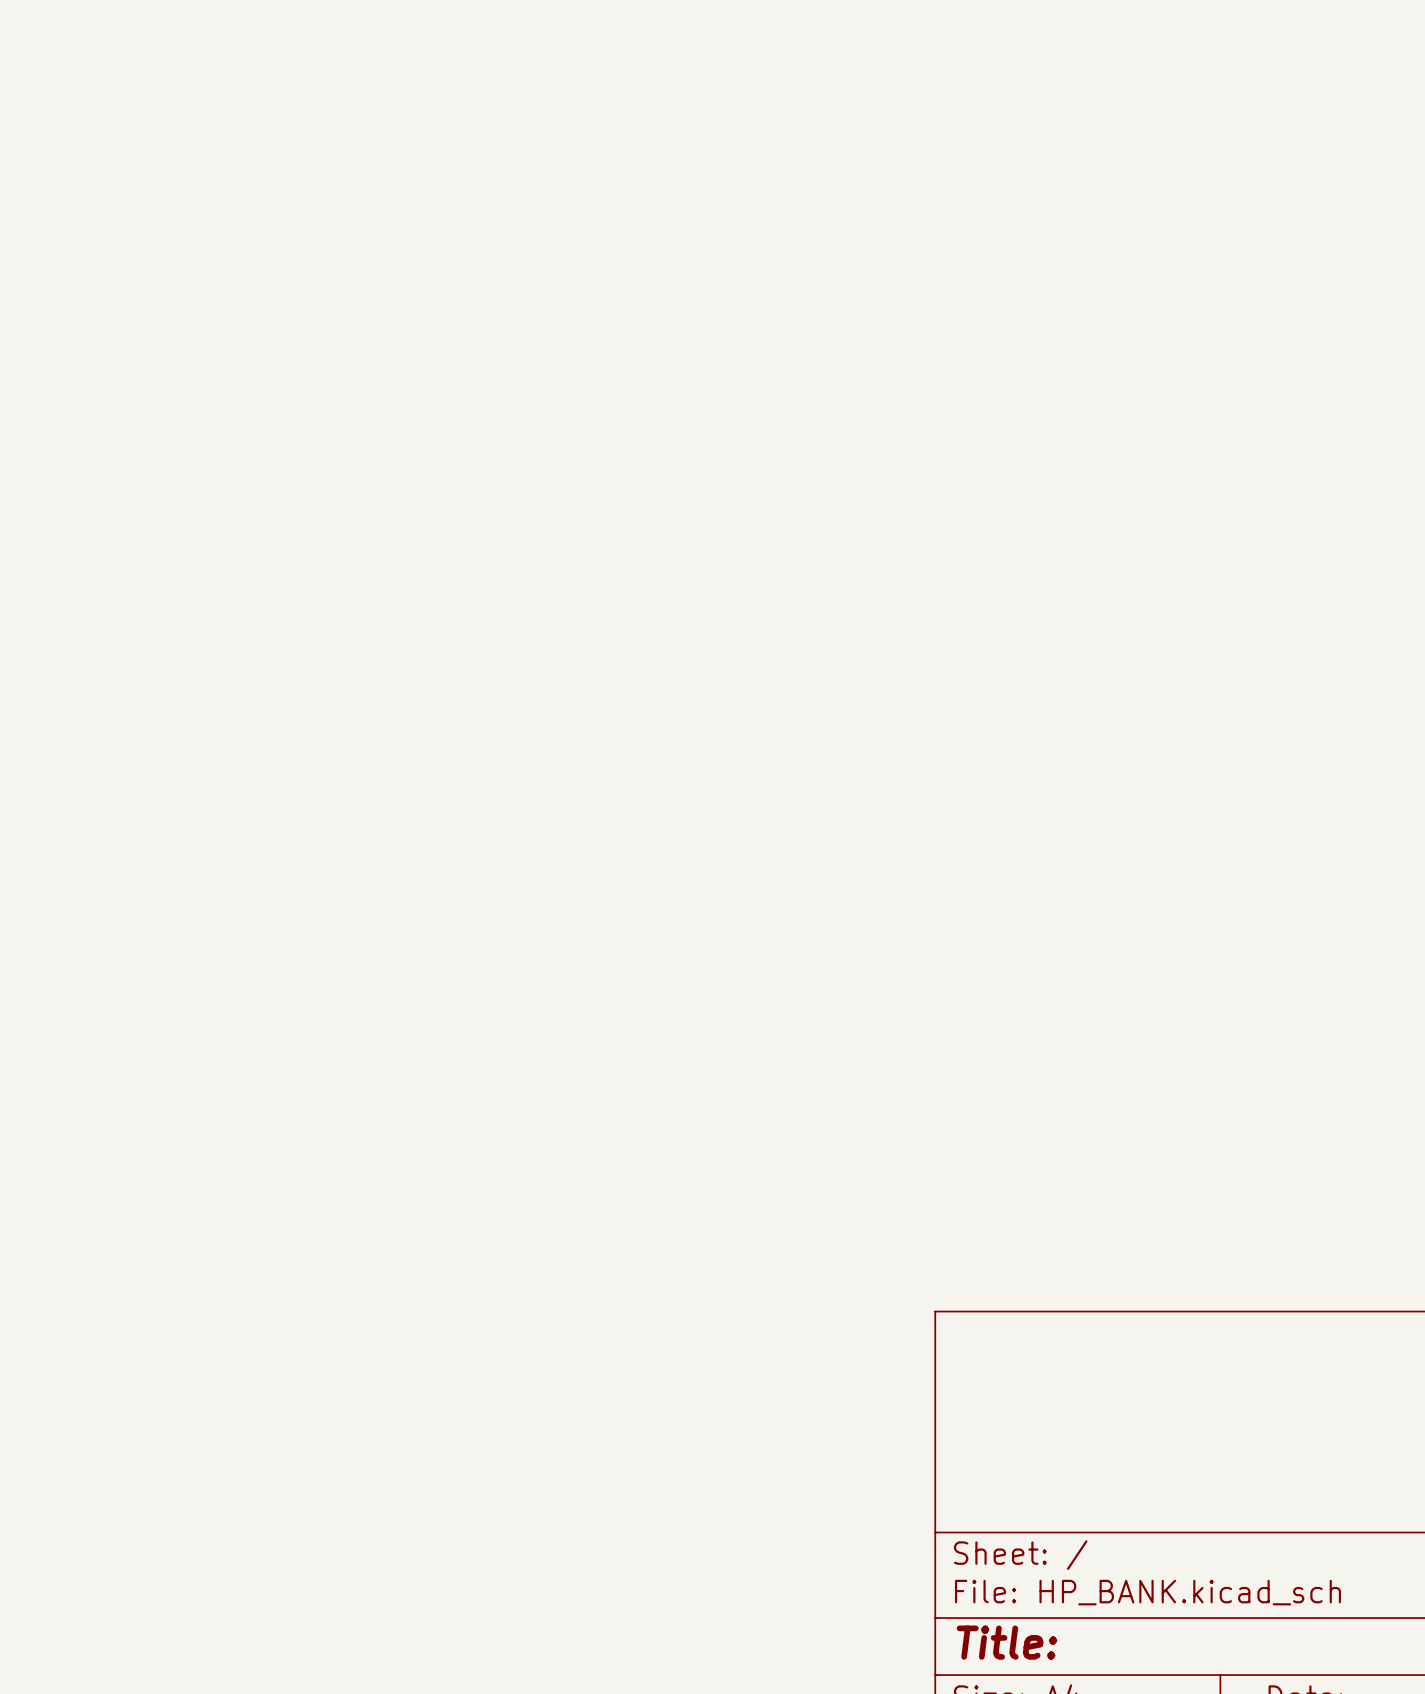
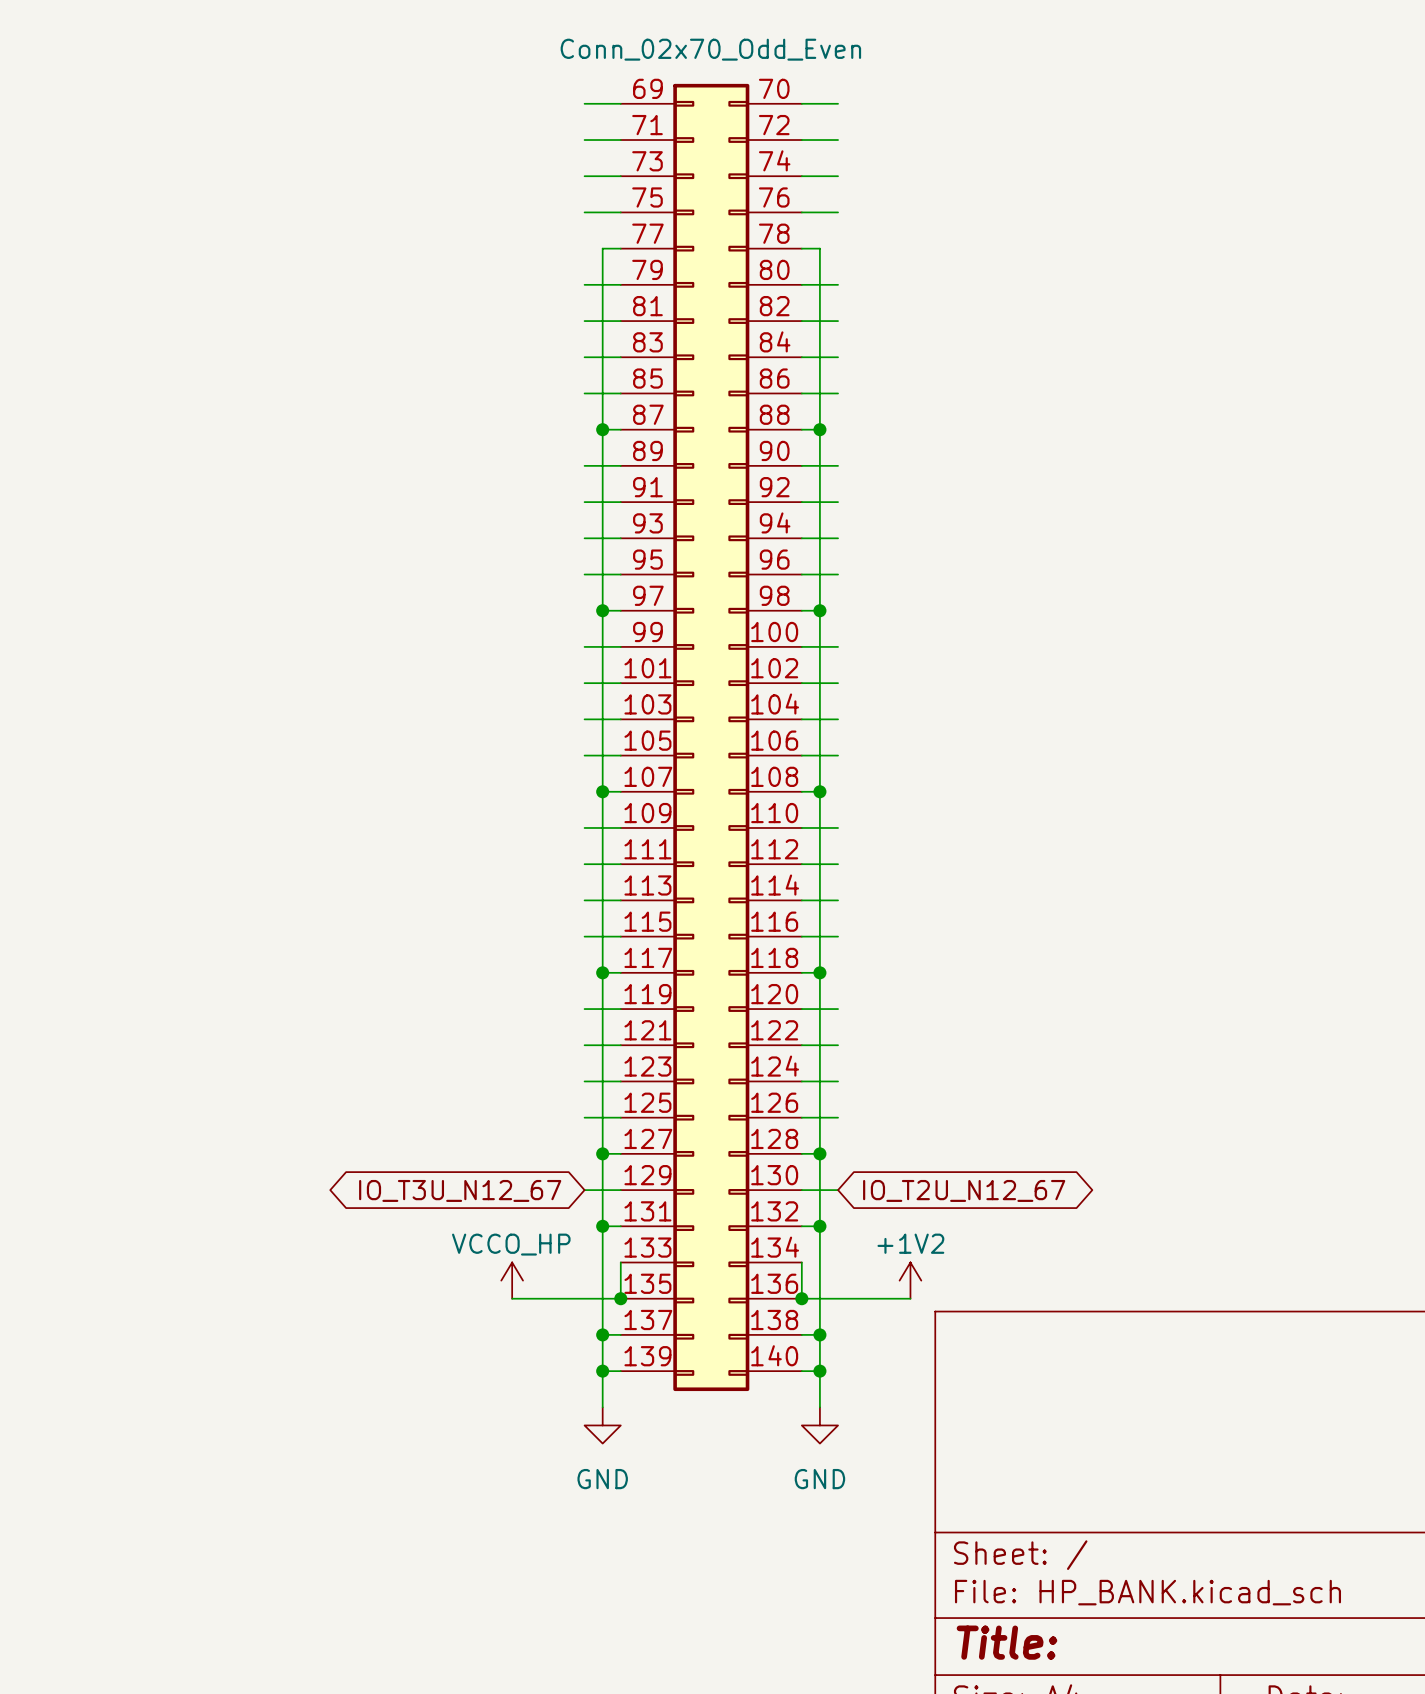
wire: none -> (584, 103) (620, 103)
wire: none -> (801, 103) (838, 103)
wire: none -> (584, 140) (620, 140)
wire: none -> (801, 140) (838, 140)
wire: none -> (584, 176) (620, 176)
wire: none -> (801, 176) (838, 176)
wire: none -> (584, 212) (620, 212)
wire: none -> (801, 212) (838, 212)
wire: none -> (620, 248) (602, 248) (602, 1407)
wire: none -> (801, 248) (819, 248) (819, 1407)
wire: none -> (584, 284) (620, 284)
wire: none -> (801, 284) (838, 284)
wire: none -> (584, 321) (620, 321)
wire: none -> (801, 321) (838, 321)
wire: none -> (584, 357) (620, 357)
wire: none -> (801, 357) (838, 357)
wire: none -> (584, 393) (620, 393)
wire: none -> (801, 393) (838, 393)
wire: none -> (602, 429) (620, 429)
junction: none -> (602, 429)
wire: none -> (801, 429) (819, 429)
junction: none -> (819, 429)
wire: none -> (584, 465) (620, 465)
wire: none -> (801, 465) (838, 465)
wire: none -> (584, 502) (620, 502)
wire: none -> (801, 502) (838, 502)
wire: none -> (584, 538) (620, 538)
wire: none -> (801, 538) (838, 538)
wire: none -> (584, 574) (620, 574)
wire: none -> (801, 574) (838, 574)
wire: none -> (602, 610) (620, 610)
junction: none -> (602, 610)
wire: none -> (801, 610) (819, 610)
junction: none -> (819, 610)
wire: none -> (584, 646) (620, 646)
wire: none -> (801, 646) (838, 646)
wire: none -> (584, 683) (620, 683)
wire: none -> (801, 683) (838, 683)
wire: none -> (584, 719) (620, 719)
wire: none -> (801, 719) (838, 719)
part: none -> Conn_02x70_Odd_Even (711, 737)
wire: none -> (584, 755) (620, 755)
wire: none -> (801, 755) (838, 755)
wire: none -> (602, 791) (620, 791)
junction: none -> (602, 791)
wire: none -> (801, 791) (819, 791)
junction: none -> (819, 791)
wire: none -> (584, 827) (620, 827)
wire: none -> (801, 827) (838, 827)
wire: none -> (584, 864) (620, 864)
wire: none -> (801, 864) (838, 864)
wire: none -> (584, 900) (620, 900)
wire: none -> (801, 900) (838, 900)
wire: none -> (584, 936) (620, 936)
wire: none -> (801, 936) (838, 936)
wire: none -> (602, 972) (620, 972)
junction: none -> (602, 972)
wire: none -> (801, 972) (819, 972)
junction: none -> (819, 972)
wire: none -> (584, 1009) (620, 1009)
wire: none -> (801, 1009) (838, 1009)
wire: none -> (584, 1045) (620, 1045)
wire: none -> (801, 1045) (838, 1045)
wire: none -> (584, 1081) (620, 1081)
wire: none -> (801, 1081) (838, 1081)
wire: none -> (584, 1117) (620, 1117)
wire: none -> (801, 1117) (838, 1117)
wire: none -> (602, 1153) (620, 1153)
junction: none -> (602, 1153)
wire: none -> (801, 1153) (819, 1153)
junction: none -> (819, 1153)
global label: none -> IO_T3U_N12_67 (460, 1190)
wire: none -> (584, 1190) (620, 1190)
wire: none -> (801, 1190) (838, 1190)
global label: none -> IO_T2U_N12_67 (964, 1190)
wire: none -> (602, 1226) (620, 1226)
junction: none -> (602, 1226)
wire: none -> (801, 1226) (819, 1226)
junction: none -> (819, 1226)
wire: none -> (620, 1262) (620, 1298) (512, 1298)
wire: none -> (801, 1262) (801, 1298) (910, 1298)
power symbol: none -> VCCO_HP (512, 1280)
power symbol: none -> +1V2 (910, 1280)
junction: none -> (620, 1298)
junction: none -> (801, 1298)
wire: none -> (602, 1334) (620, 1334)
junction: none -> (602, 1334)
wire: none -> (801, 1334) (819, 1334)
junction: none -> (819, 1334)
wire: none -> (602, 1371) (620, 1371)
junction: none -> (602, 1371)
wire: none -> (801, 1371) (819, 1371)
junction: none -> (819, 1371)
power symbol: none -> GND (602, 1425)
power symbol: none -> GND (819, 1425)

